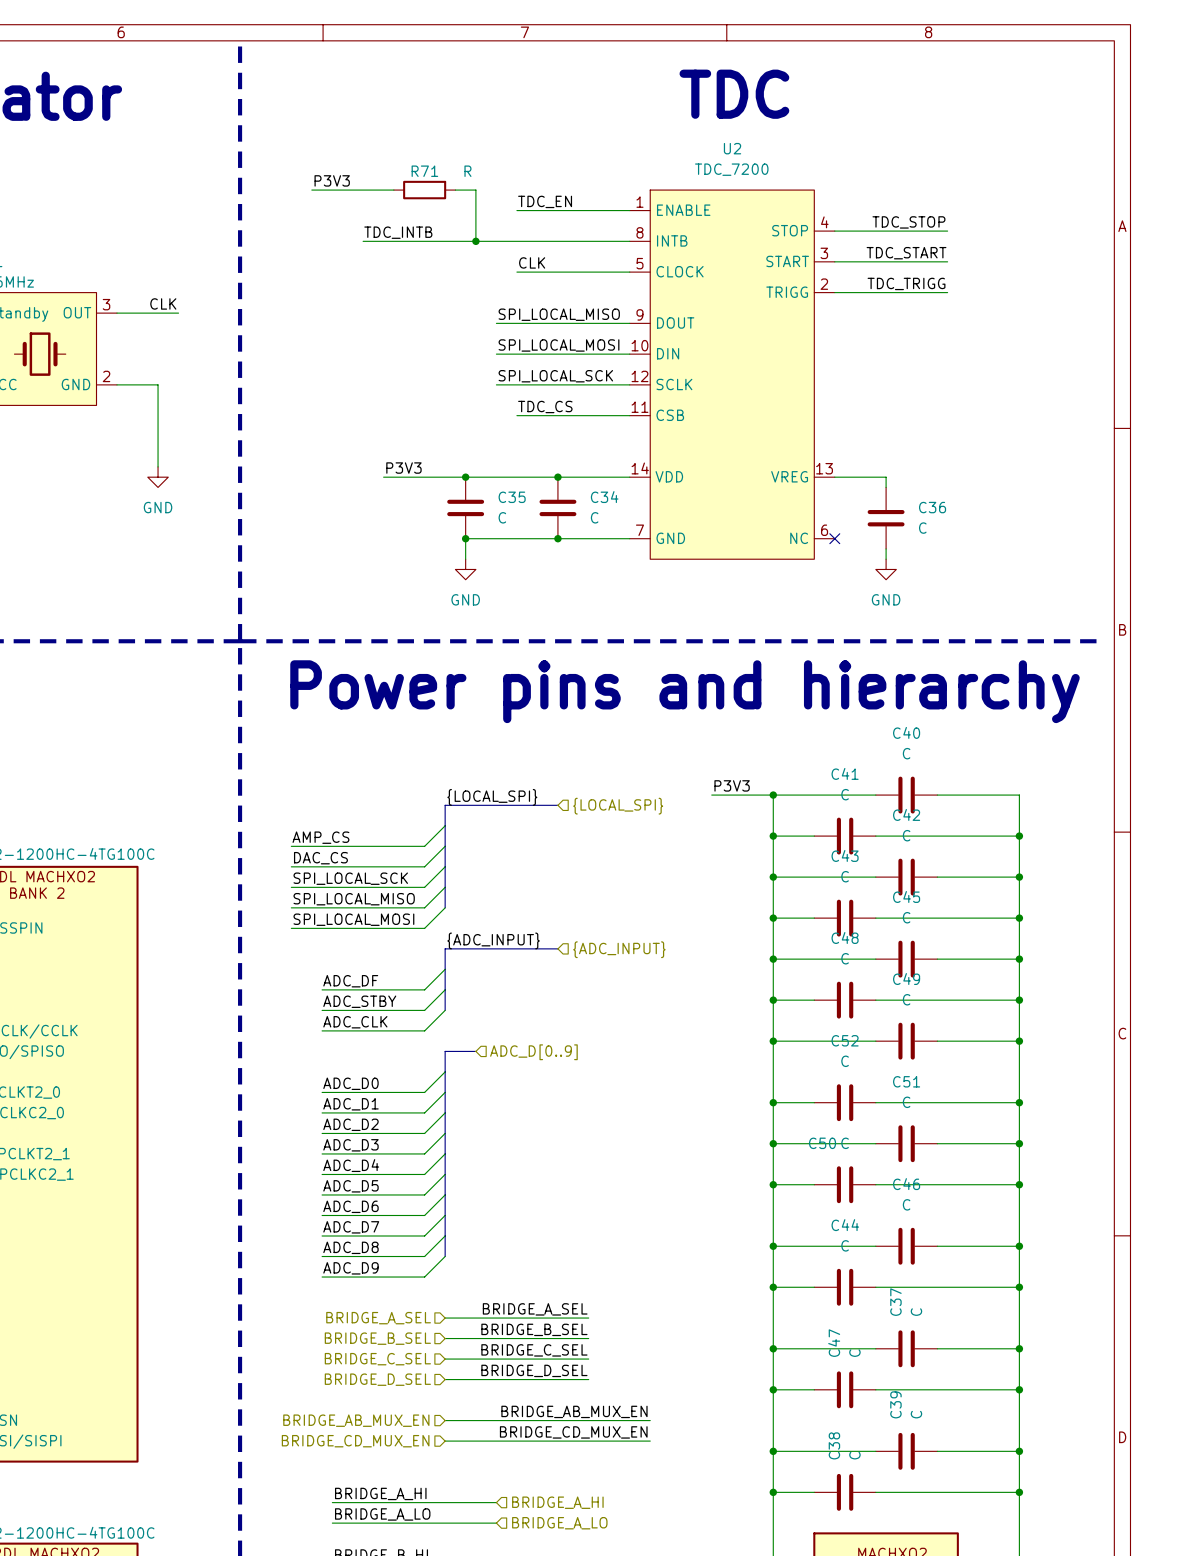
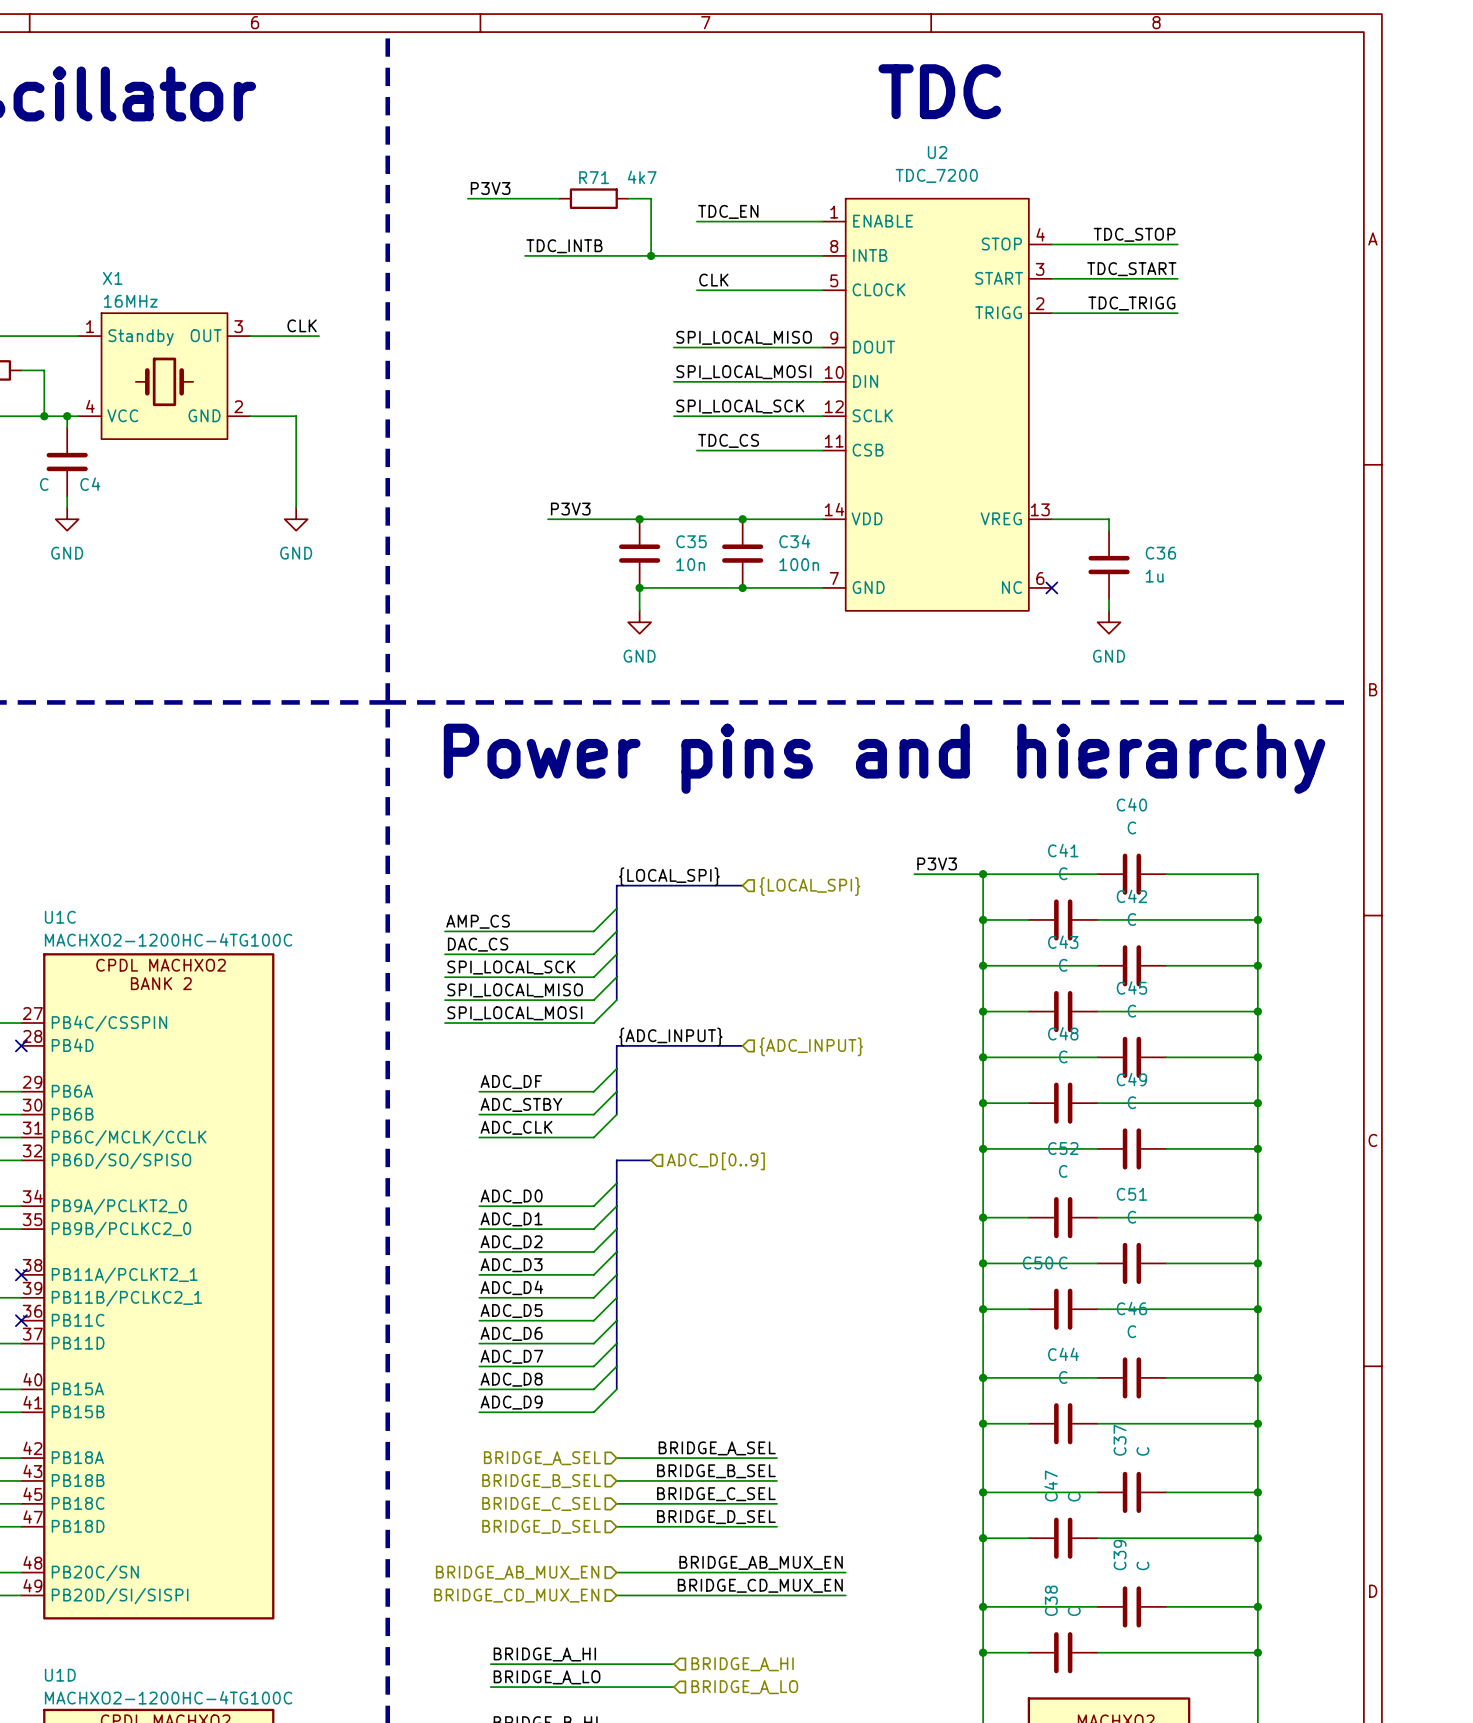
R71 value: R (467, 171) -> 4k7 (642, 177)
C35 value: C (502, 517) -> 10n (690, 564)
C34 value: C (594, 517) -> 100n (799, 564)
C36 value: C (922, 528) -> 1u (1154, 576)

